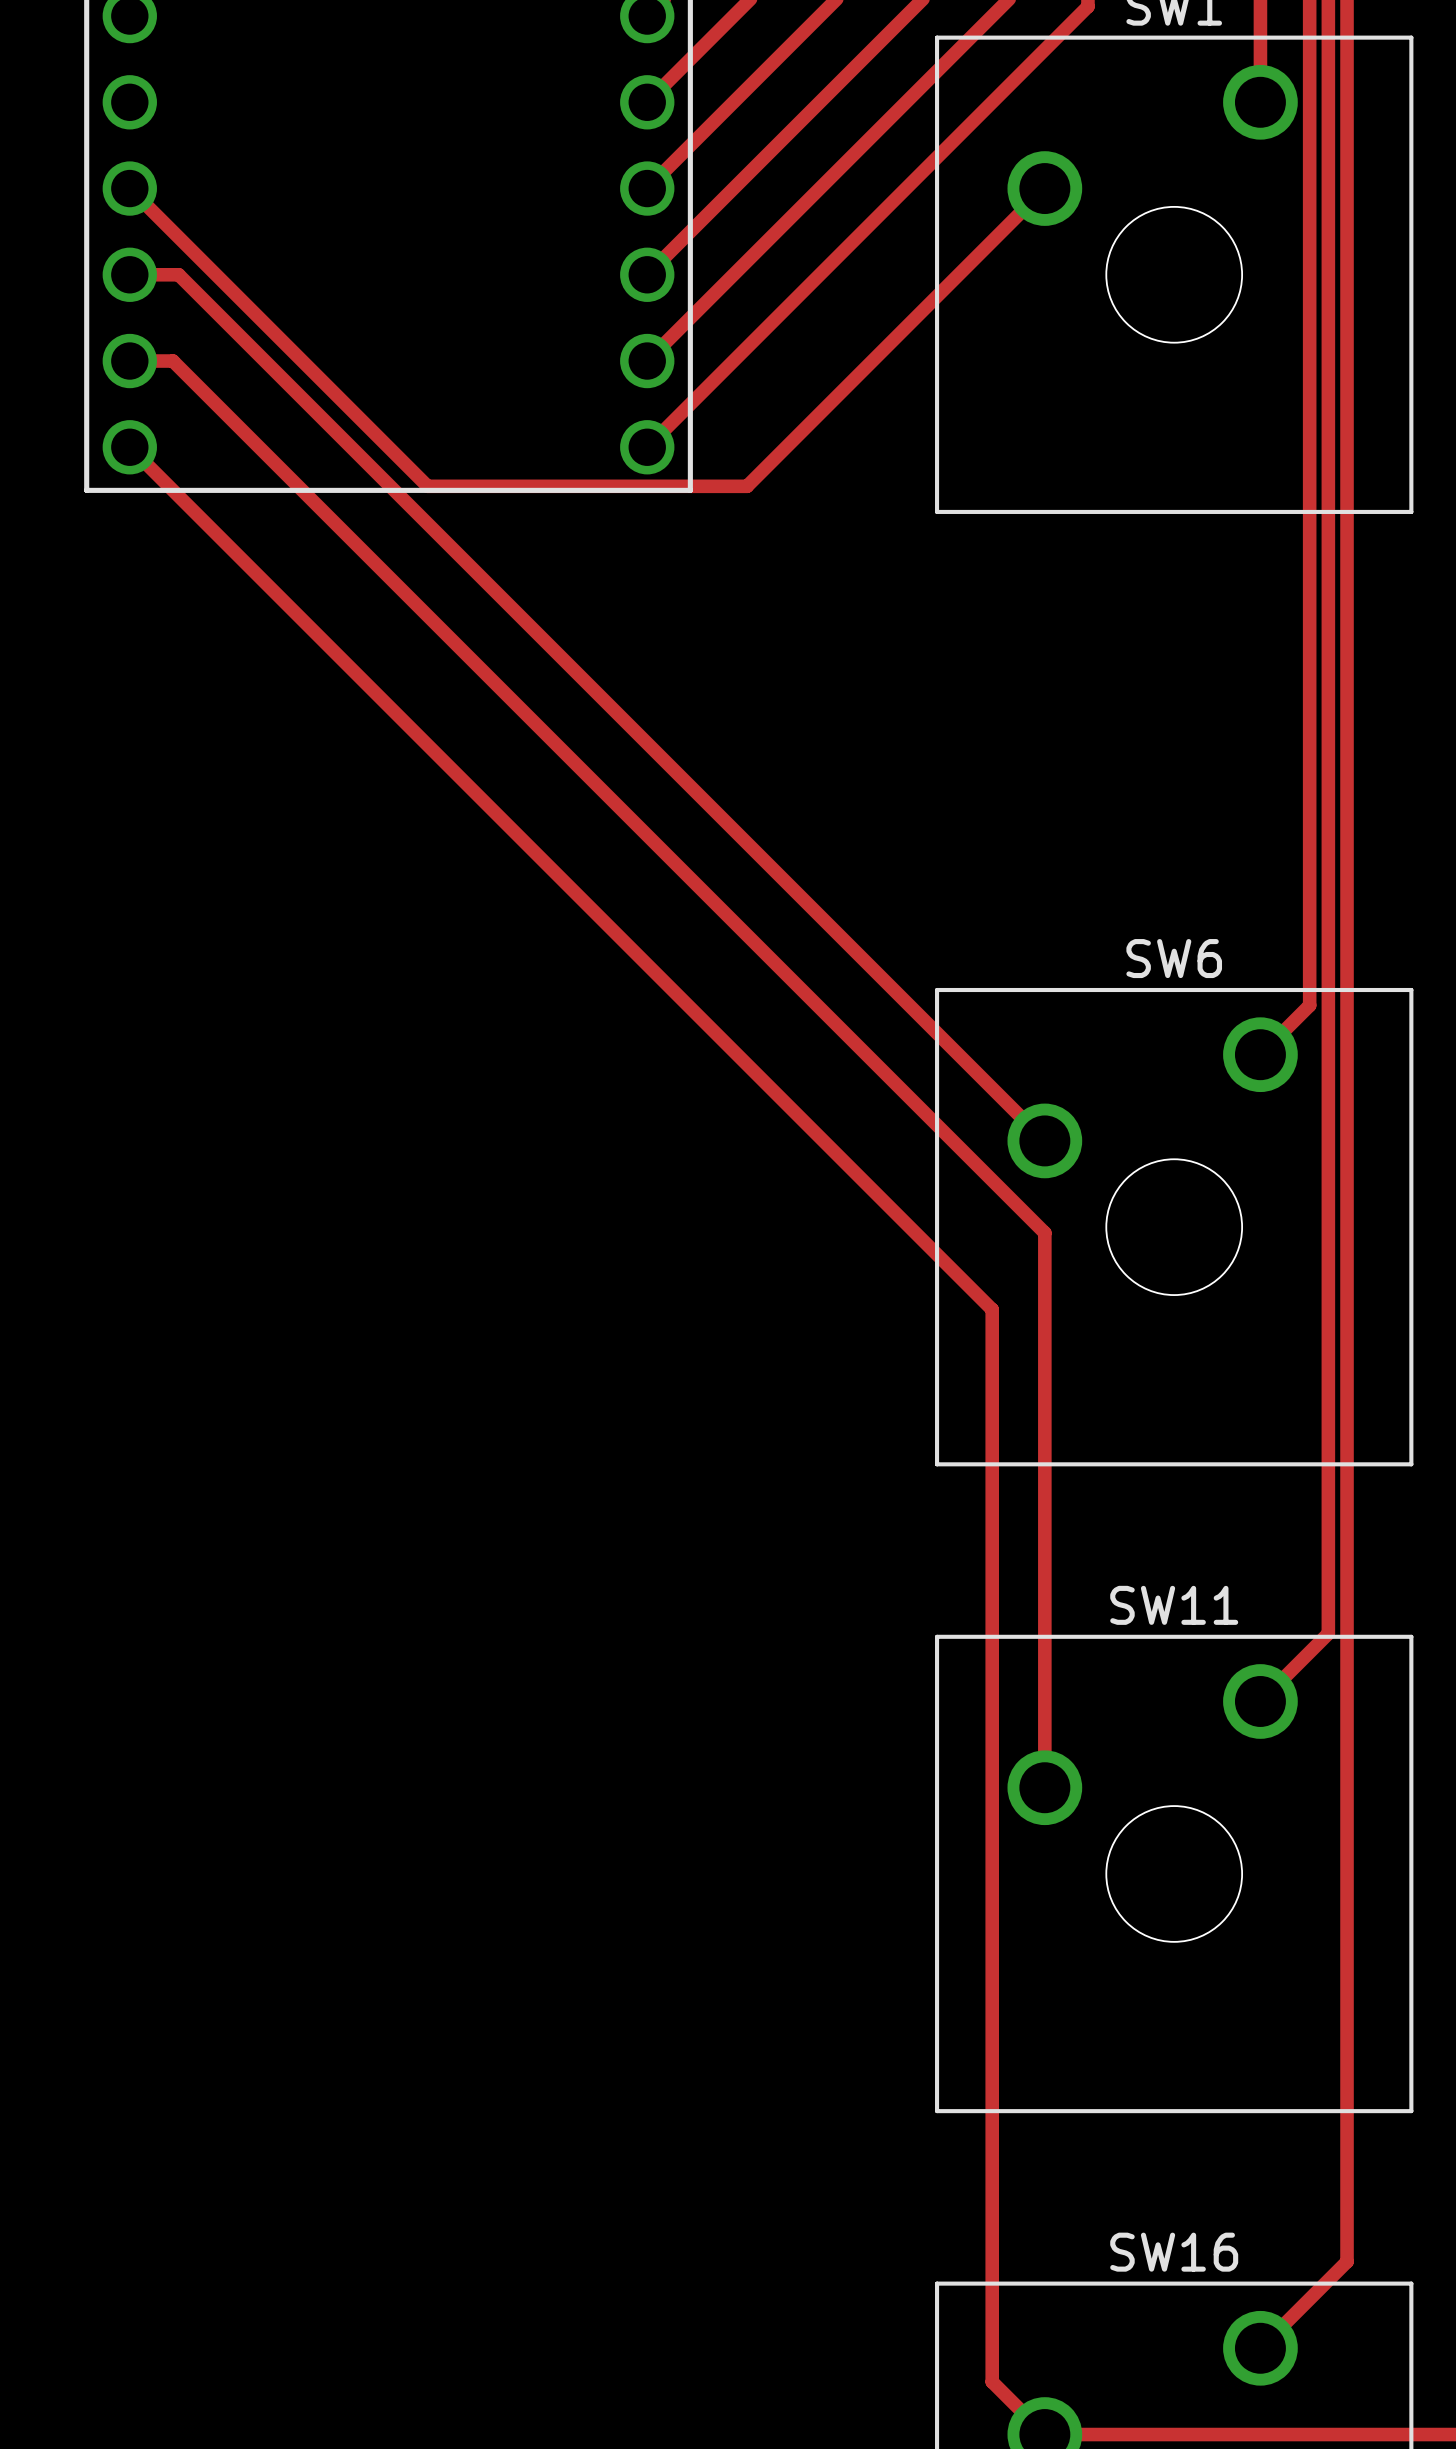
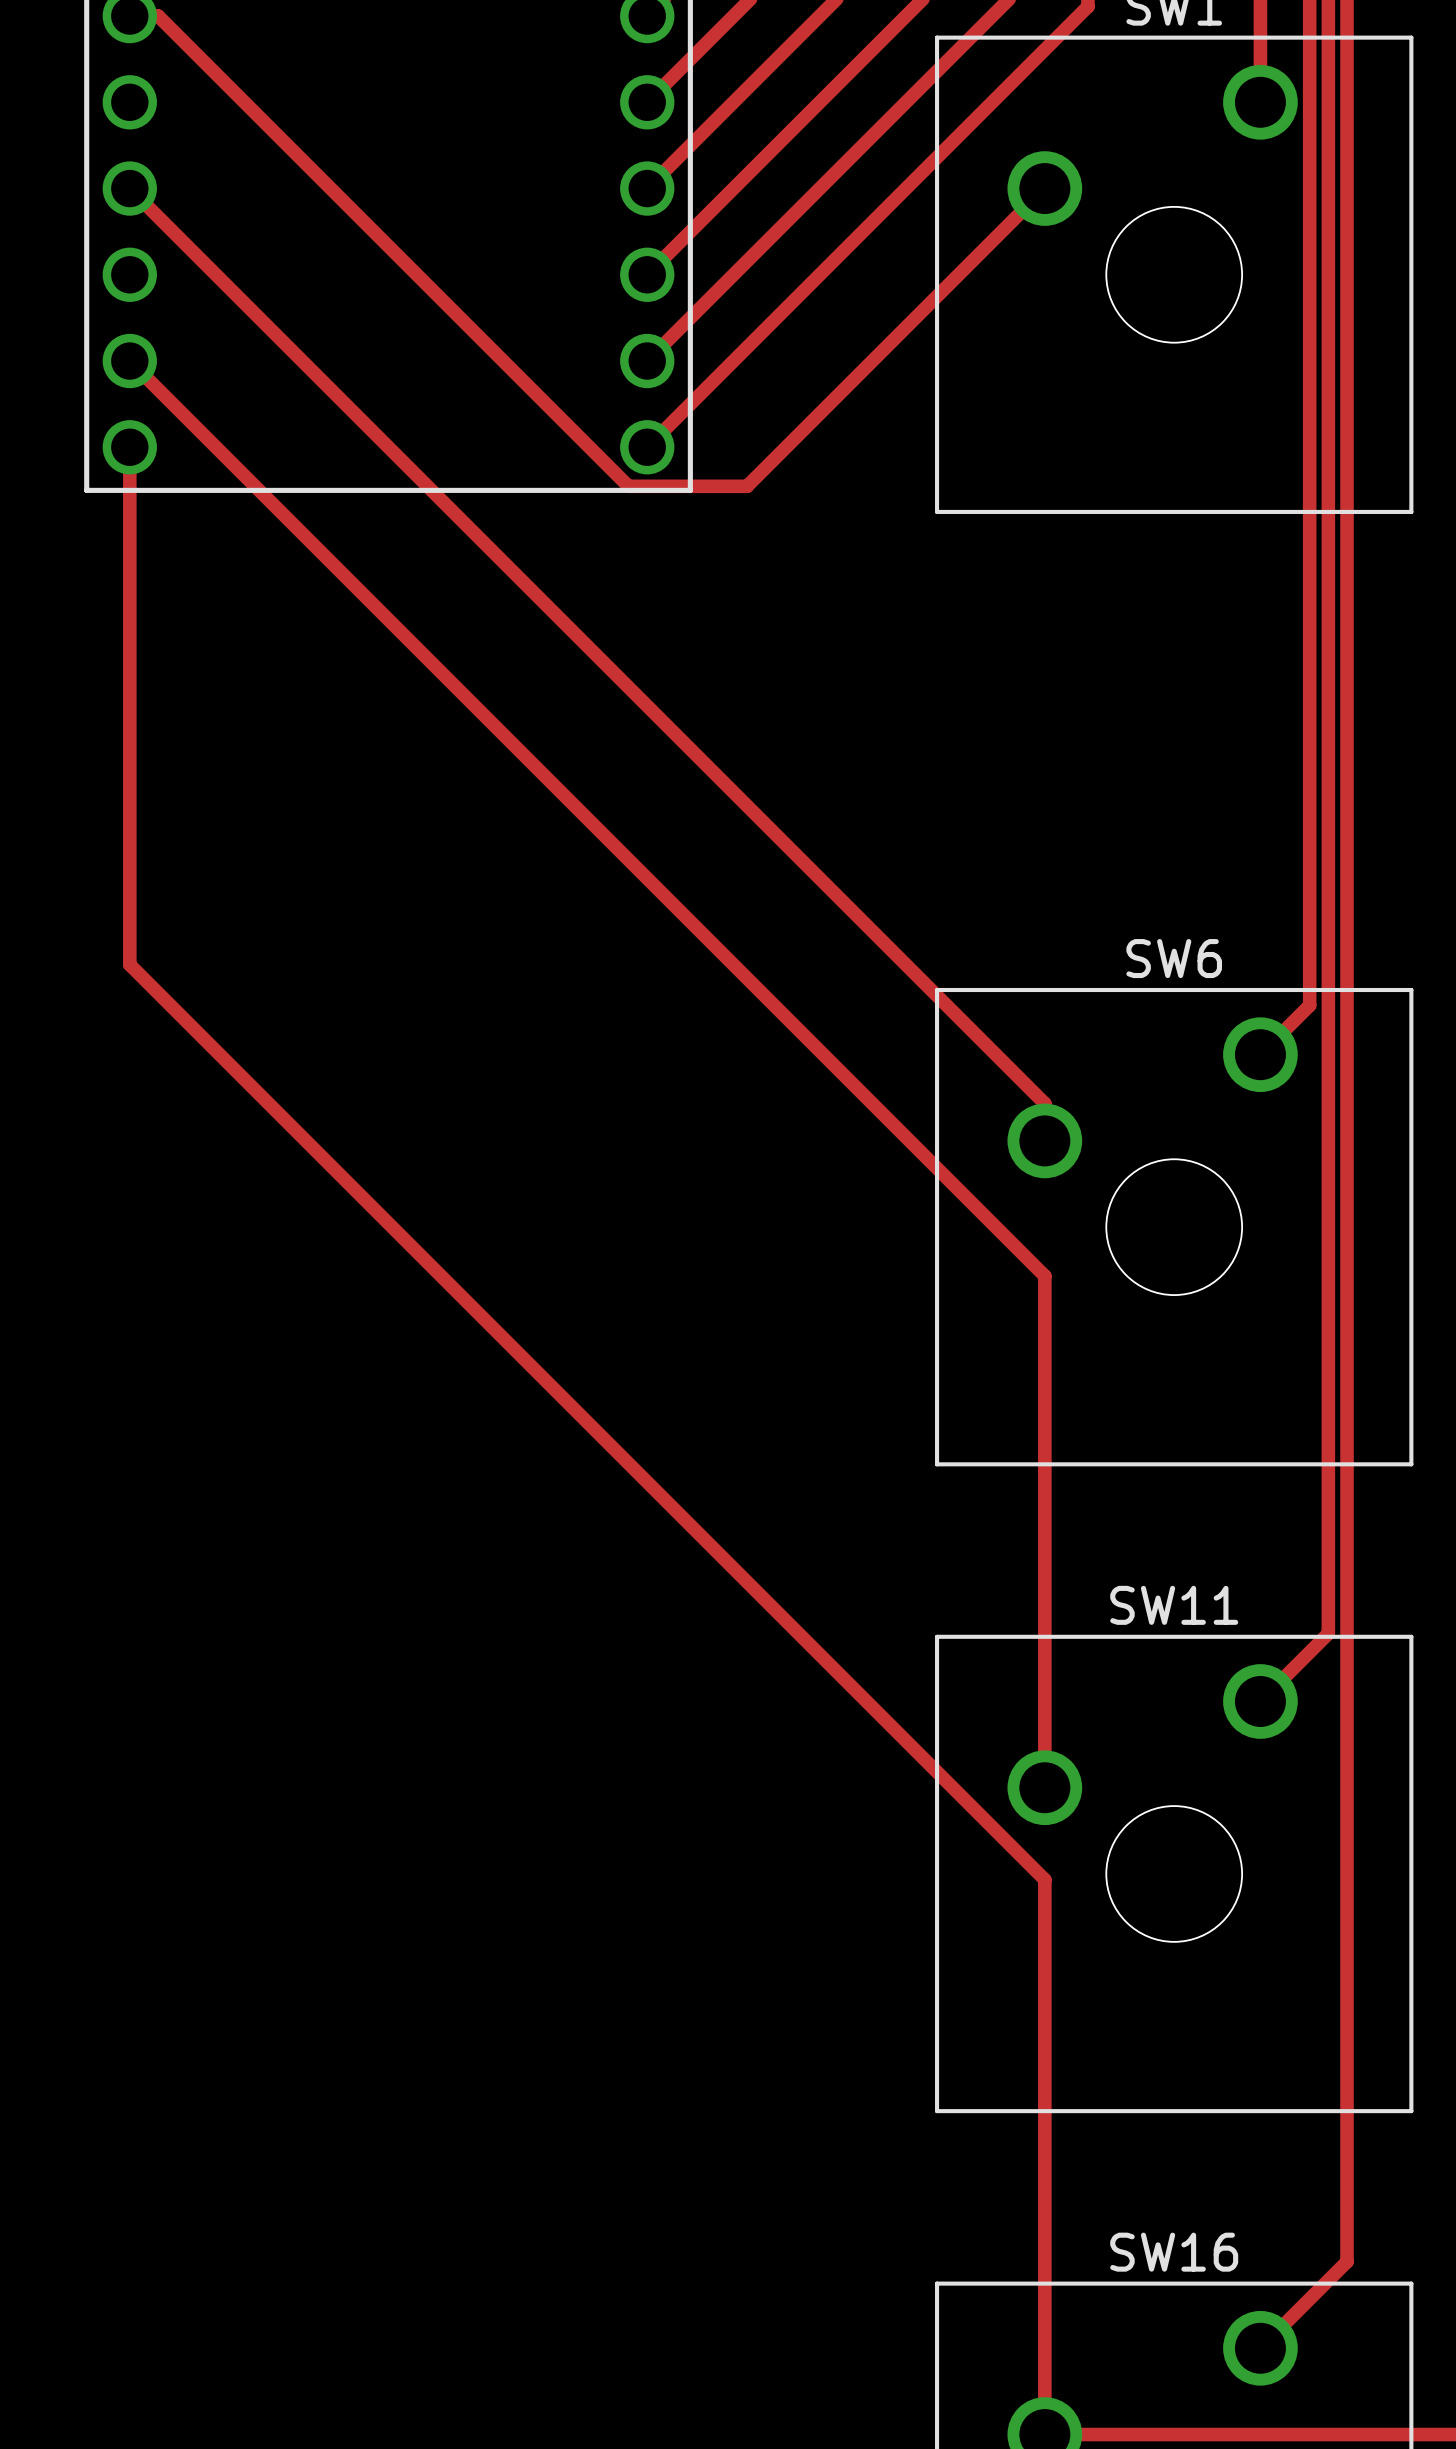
top track: (129, 274) (178, 274) (1044, 1140) -> (427, 486) (1044, 1103) (1044, 1140)
top track: (129, 361) (172, 361) (1044, 1232) (1044, 1276) -> (129, 361) (1044, 1276)
top track: (129, 447) (992, 1309) (992, 2381) (1044, 2434) -> (129, 447) (129, 964) (1044, 1879) (1044, 2434)
top track: (427, 486) (628, 486) -> (129, 16) (158, 16) (628, 486)

